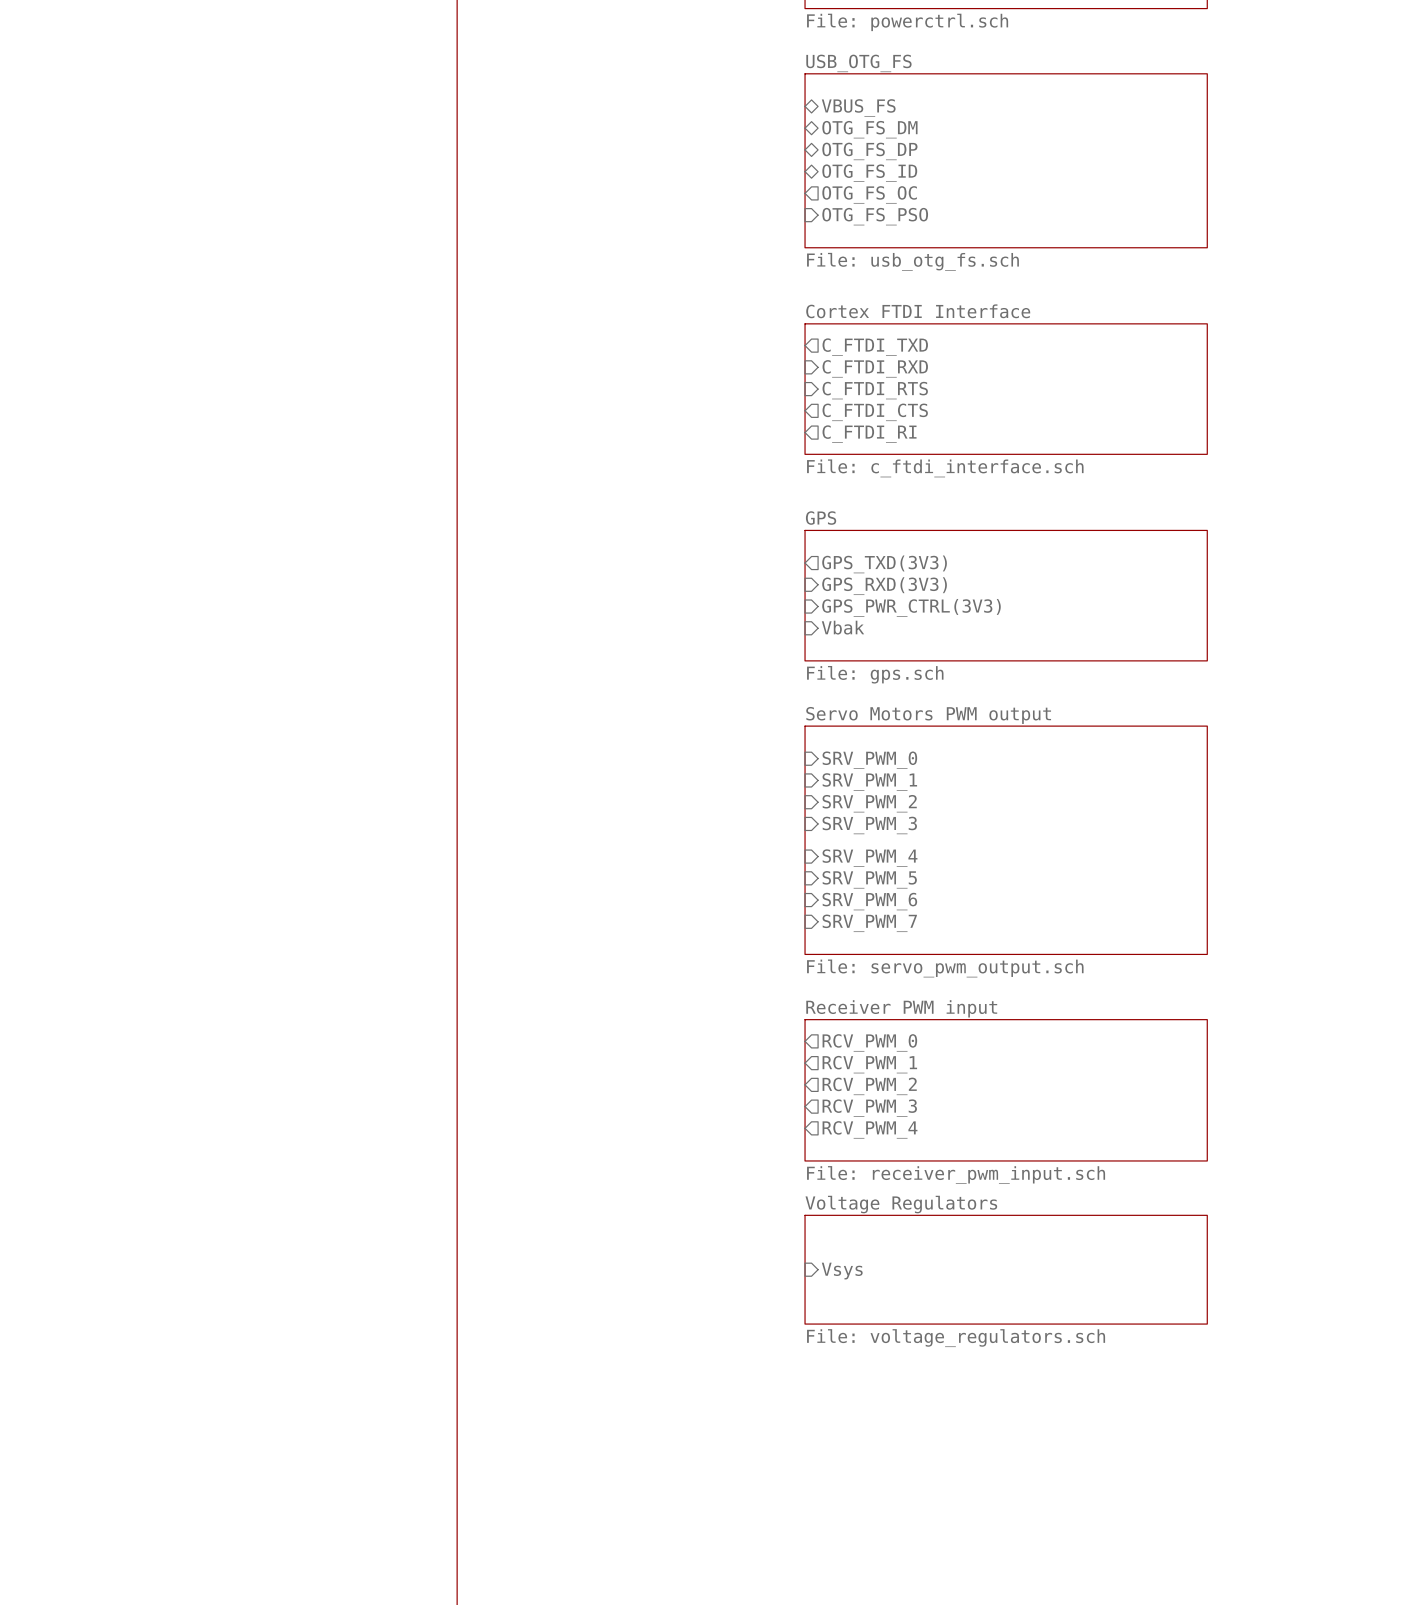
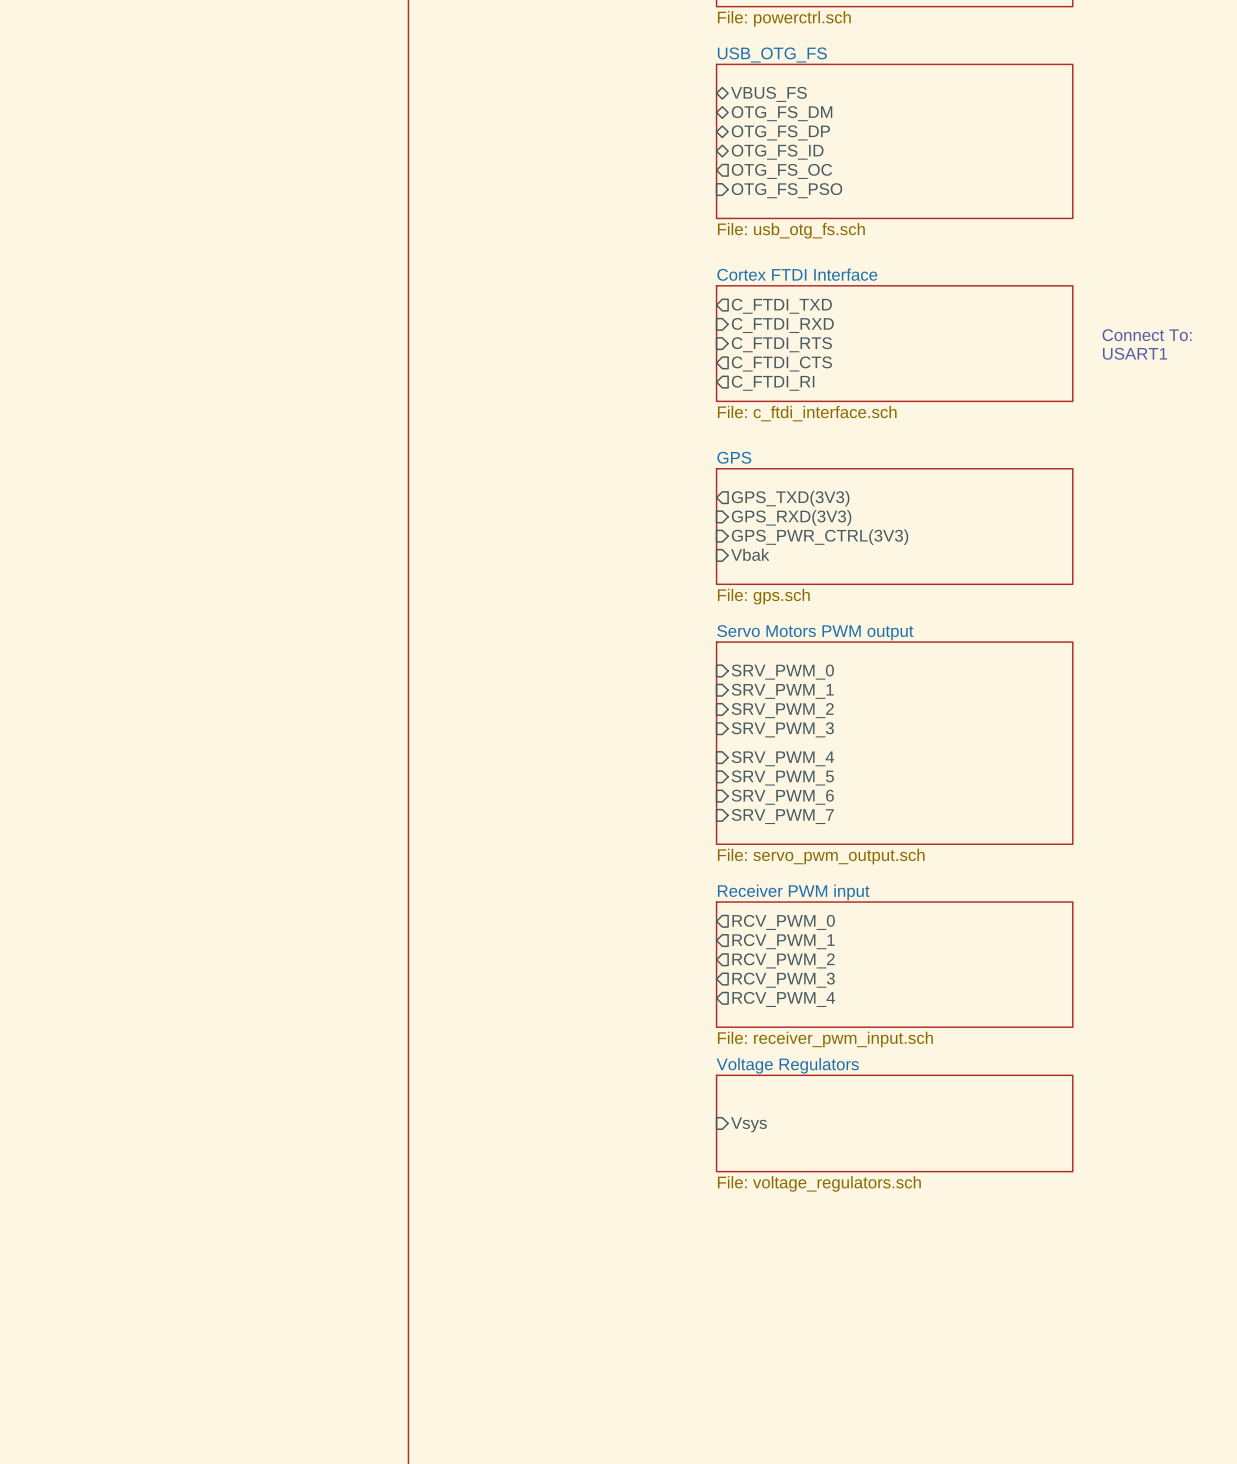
text: none -> Connect To: (1147, 335)
text: none -> USART1 (1135, 353)

